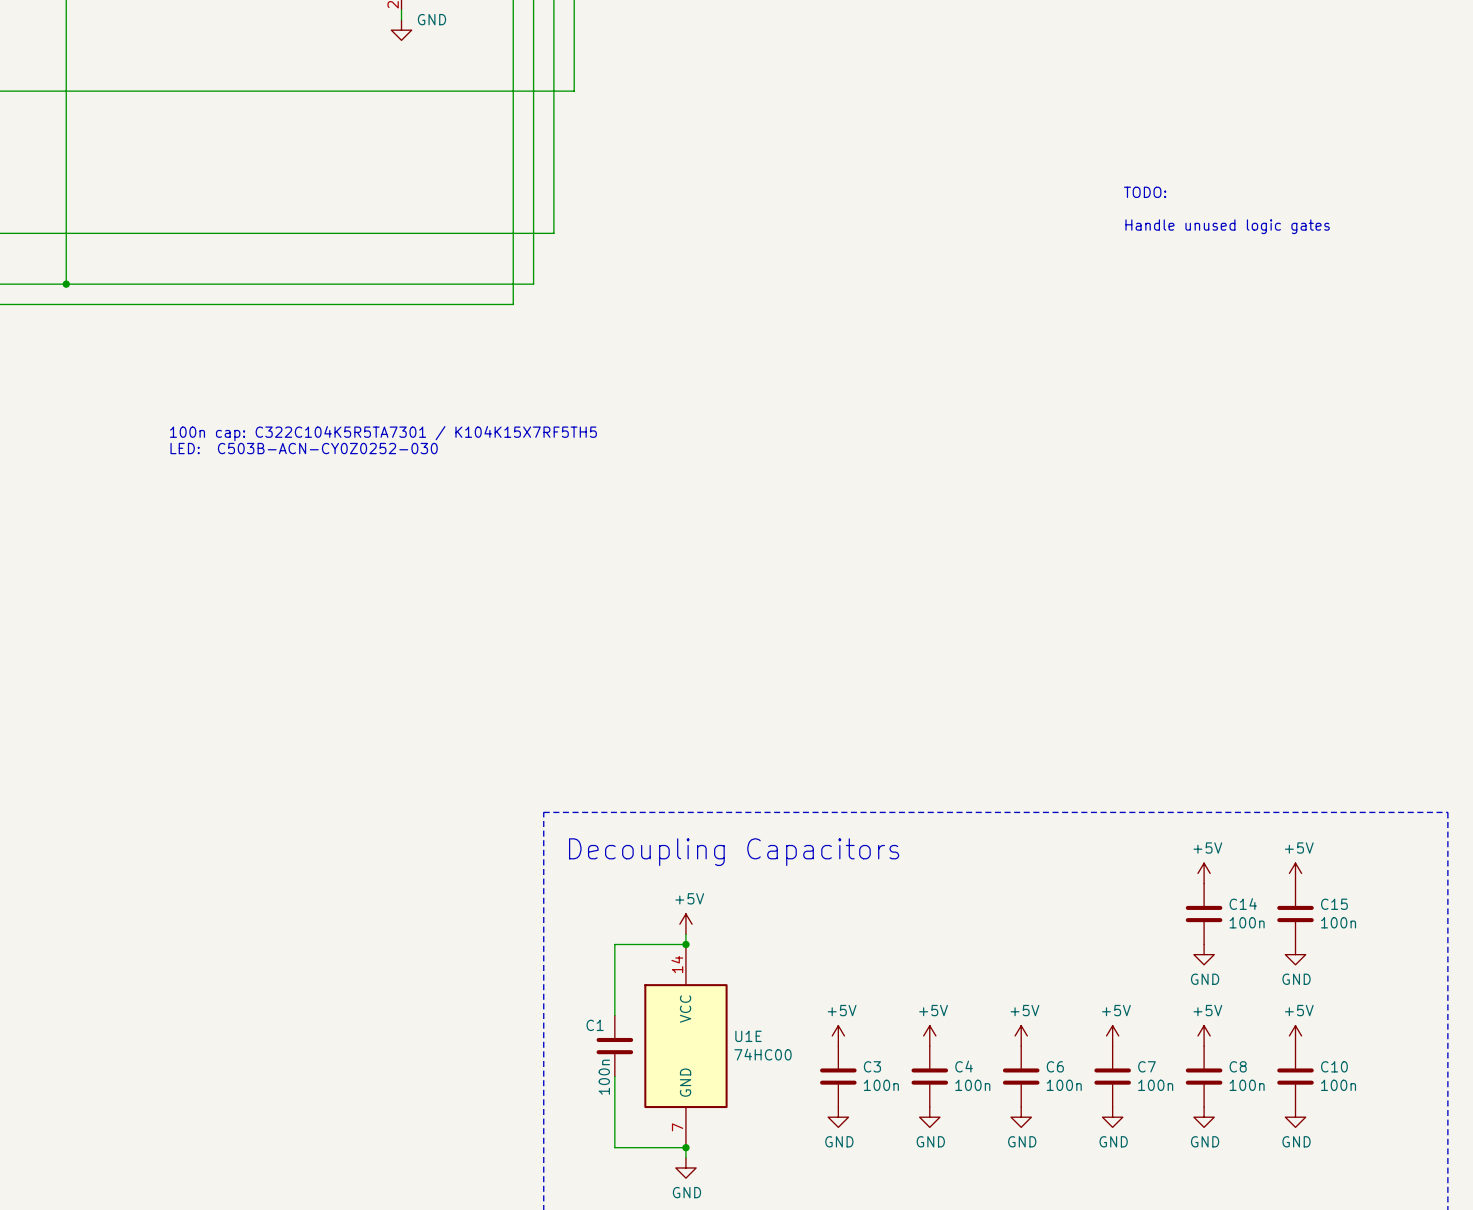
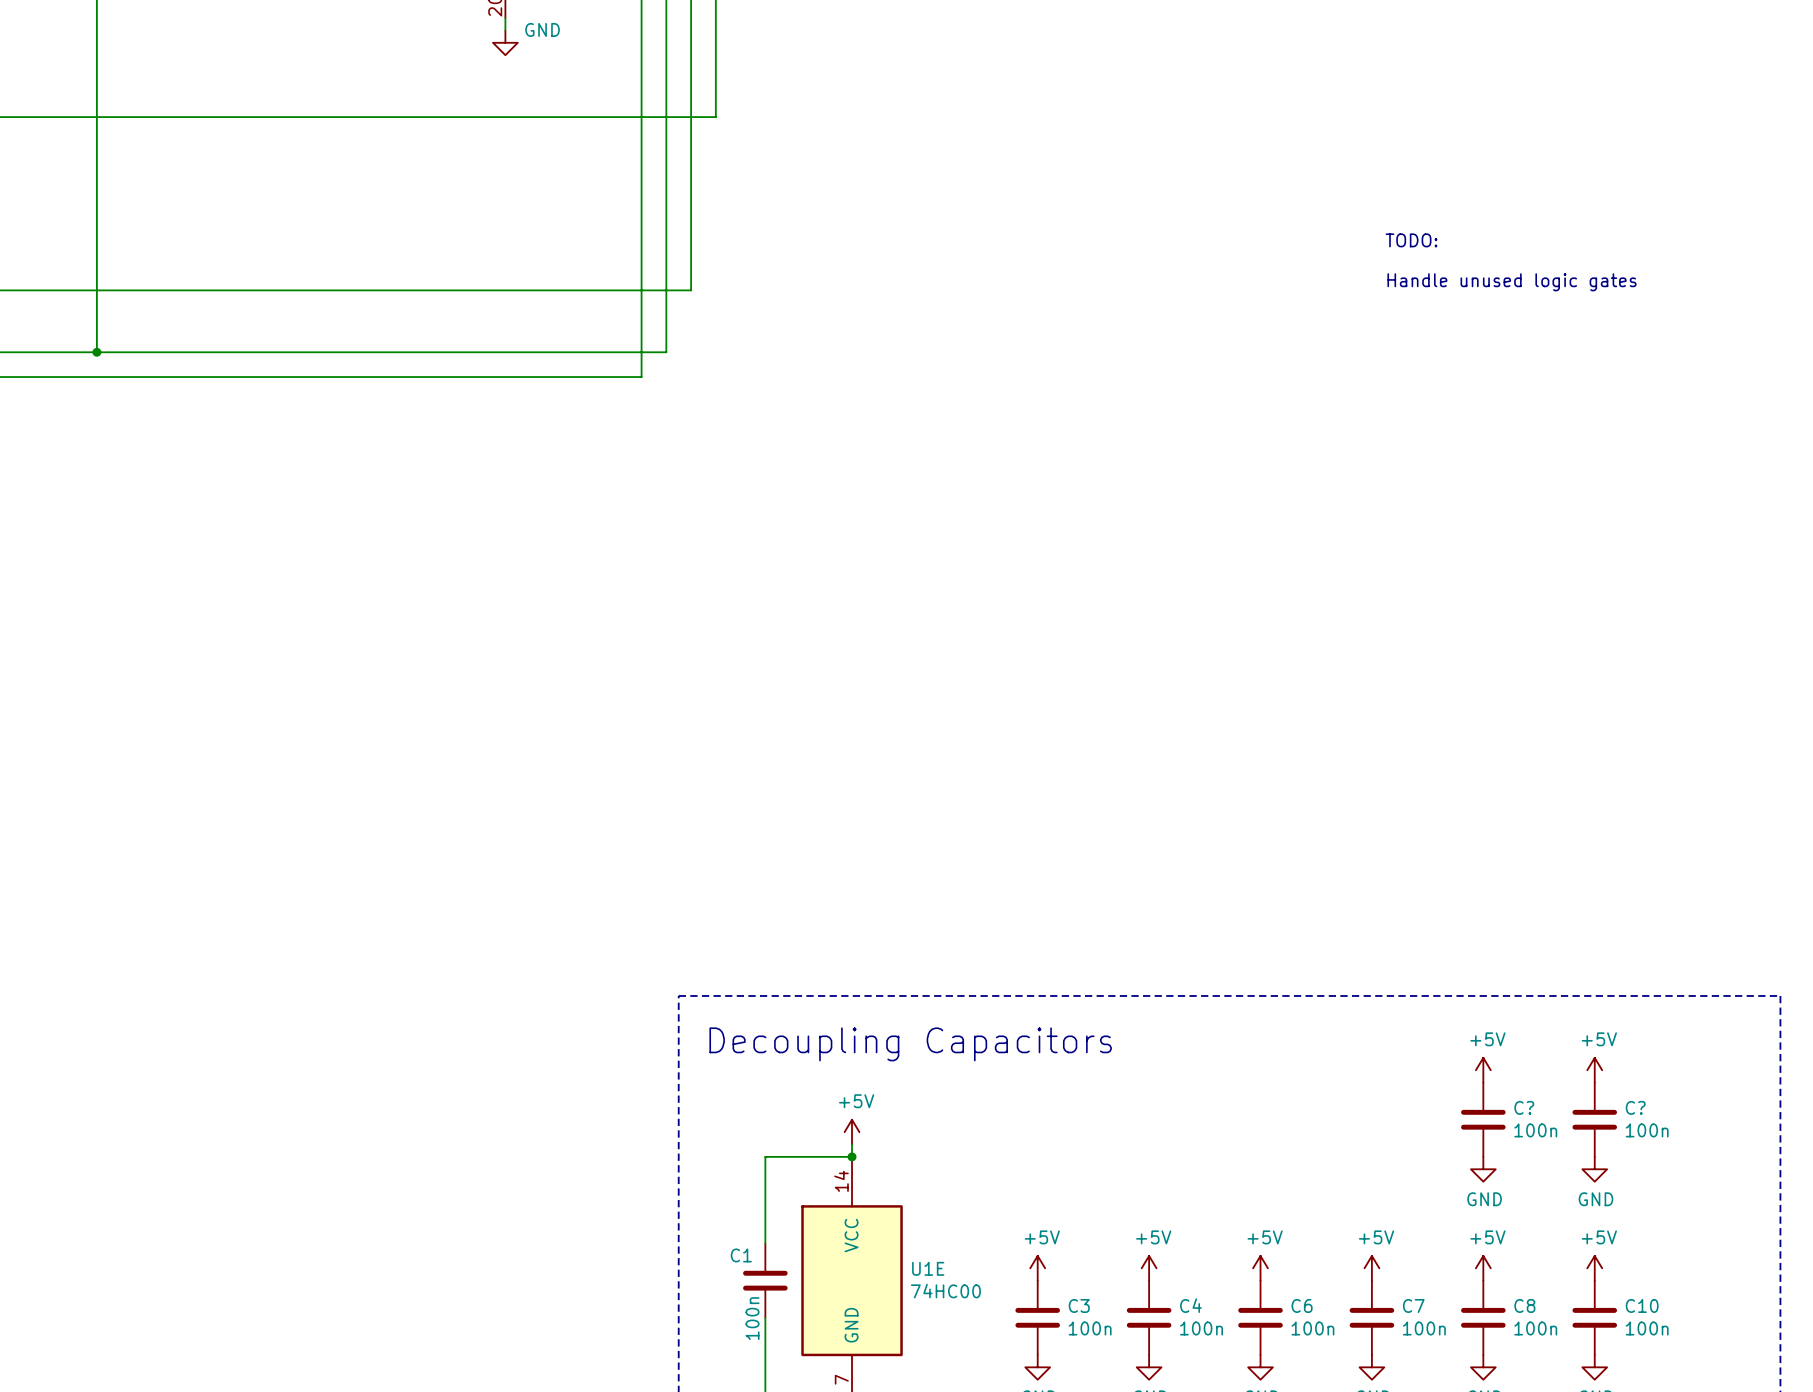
text: 100n cap: C322C104K5R5TA7301 / K104K15X7RF5TH5 (383, 433) -> none
text: LED: C503B-ACN-CY0Z0252-030 (304, 448) -> none
C14 name: C14 (1243, 904) -> C? (1524, 1107)
C15 name: C15 (1334, 904) -> C? (1635, 1107)

